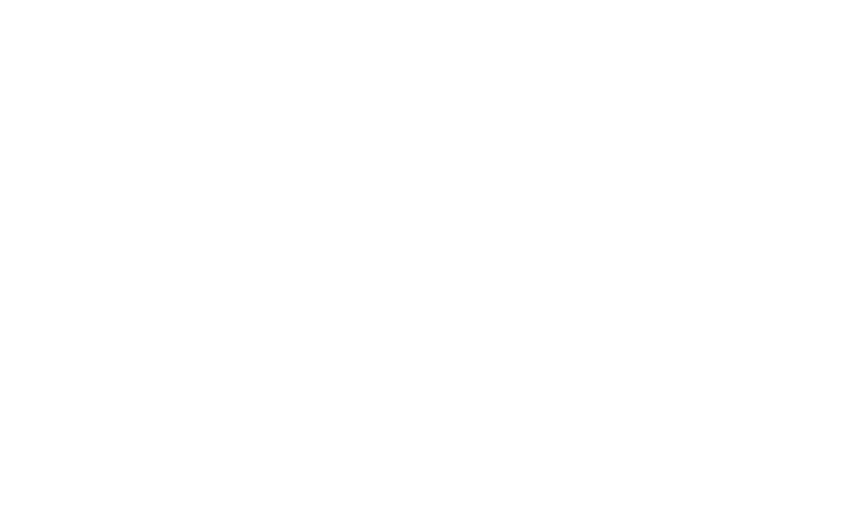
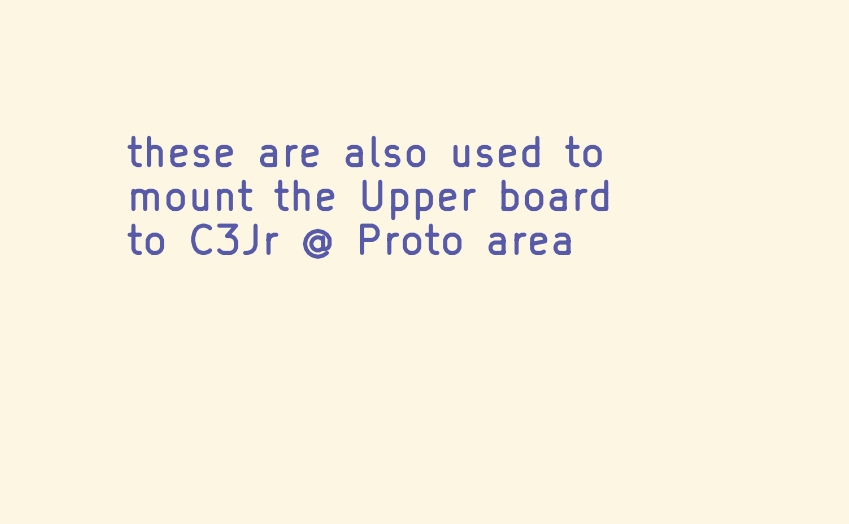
text: none -> these are also used to (364, 151)
text: none -> mount the Upper board (369, 199)
text: none -> to C3Jr @ Proto area (349, 241)

